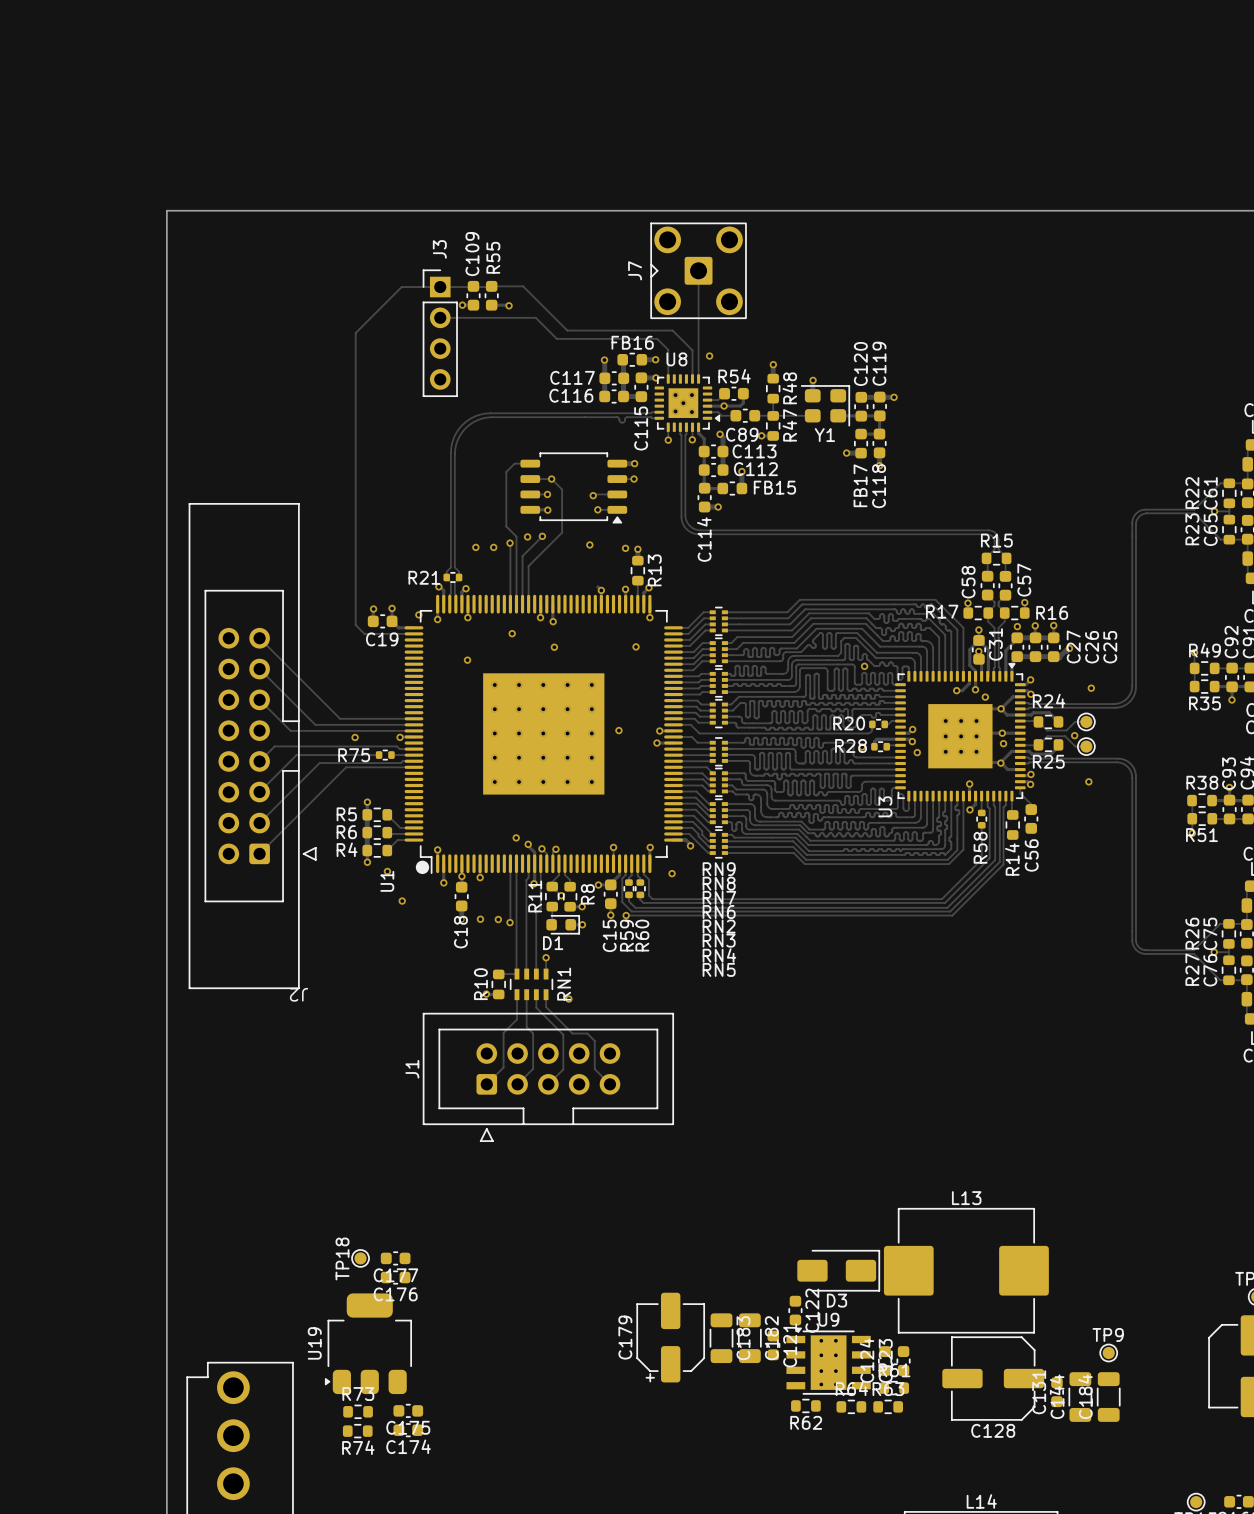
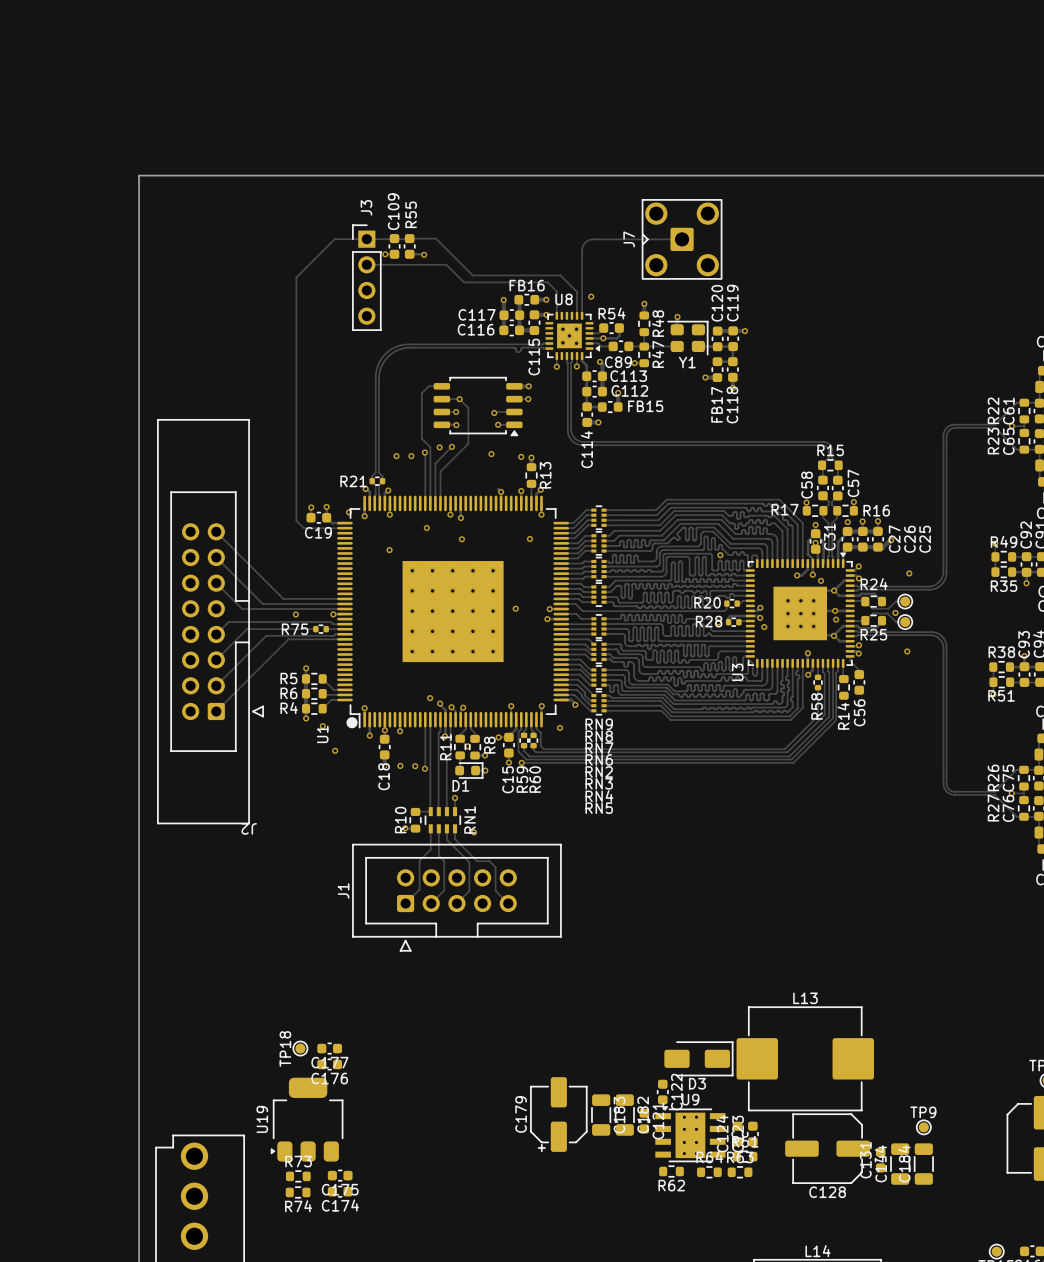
track: (697, 270) (698, 300) -> (682, 239) (591, 239) (584, 243) (582, 250)
J7 position: (698, 270) -> (682, 239)

